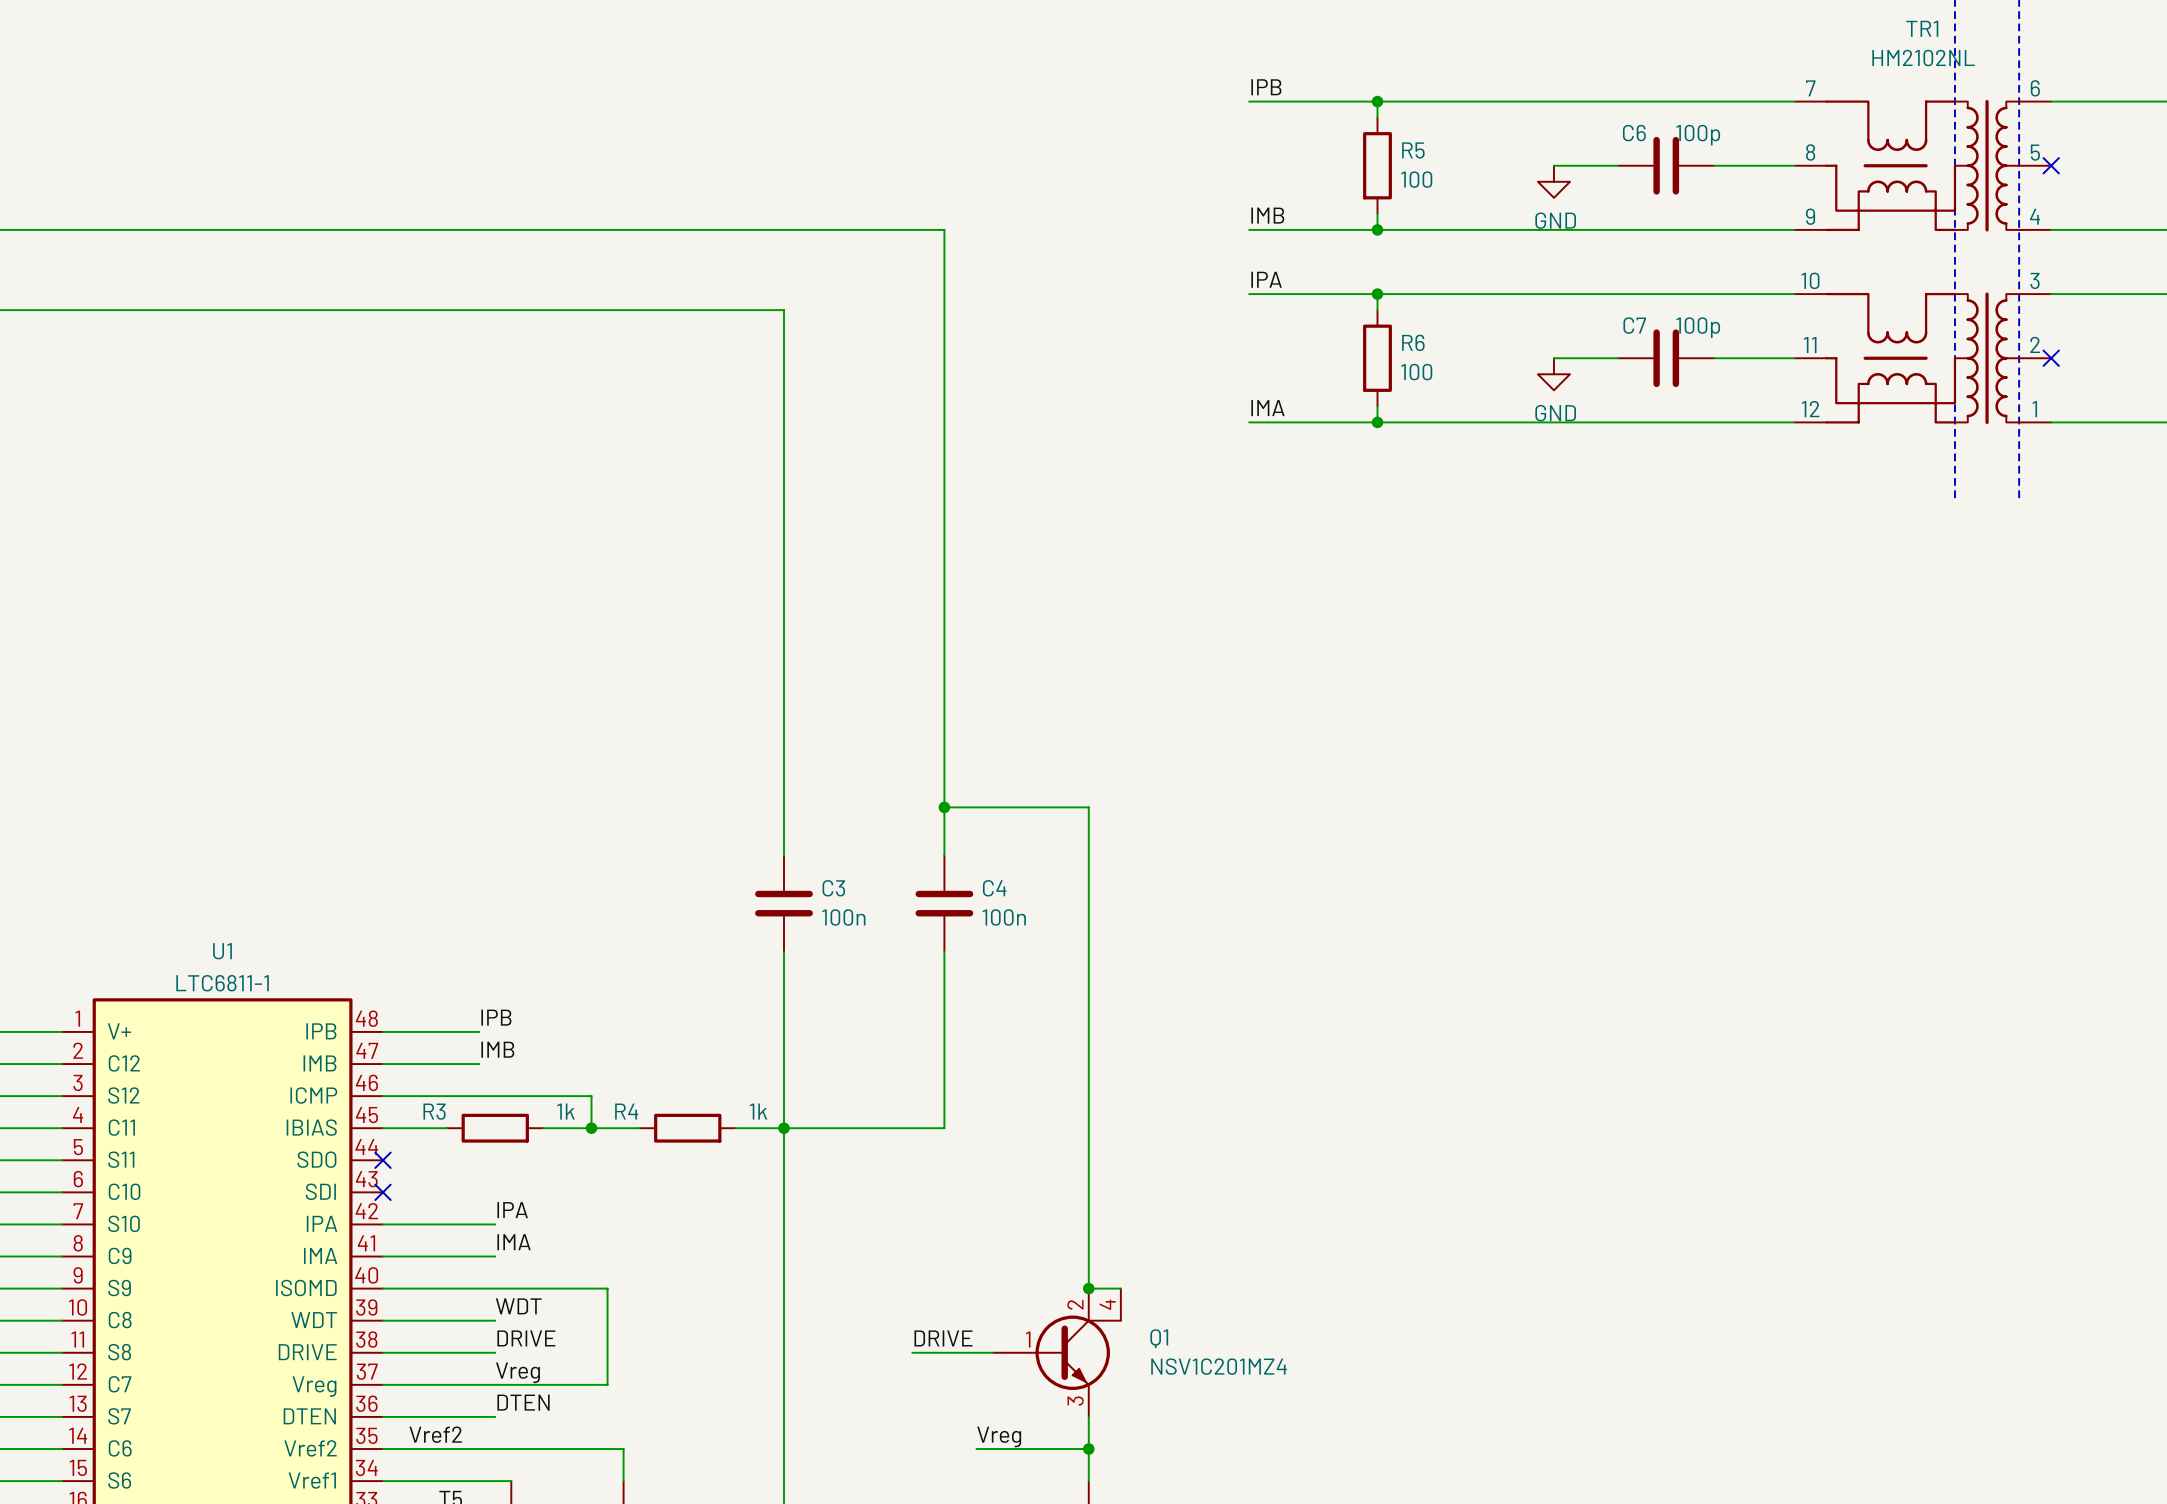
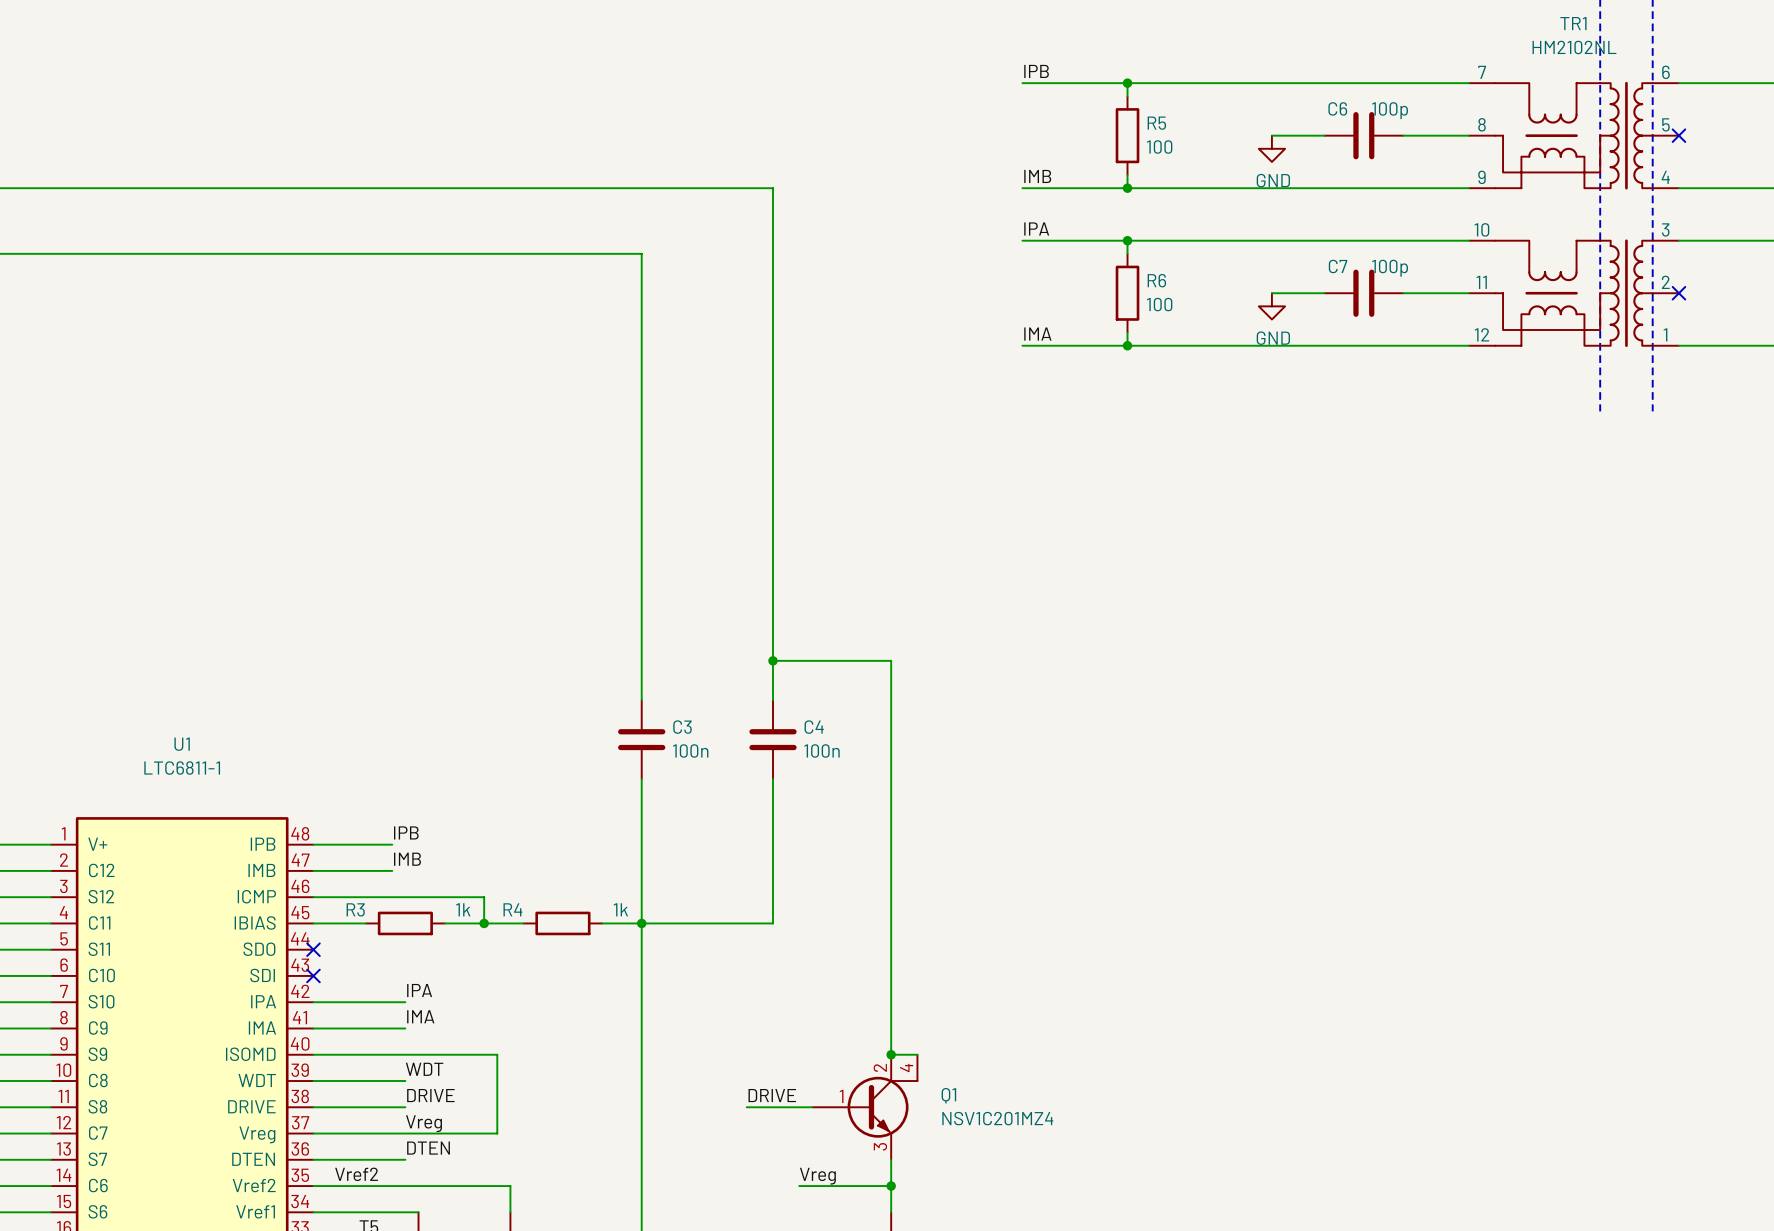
U1 name position: U1 (222, 951) -> U1 (182, 744)
U1 value position: LTC6811-1 (222, 983) -> LTC6811-1 (182, 768)

